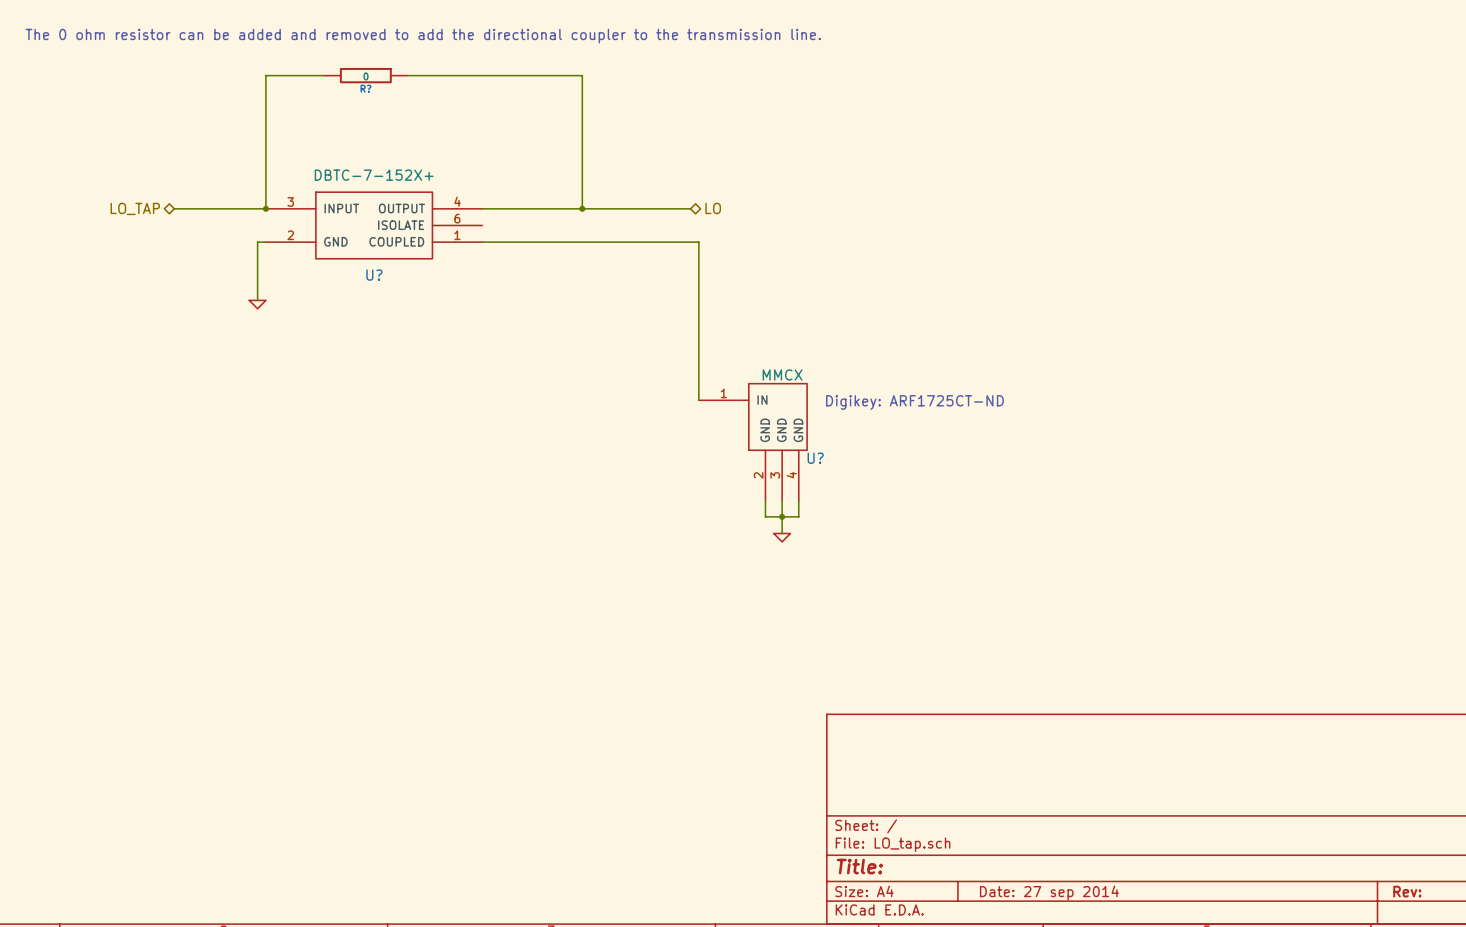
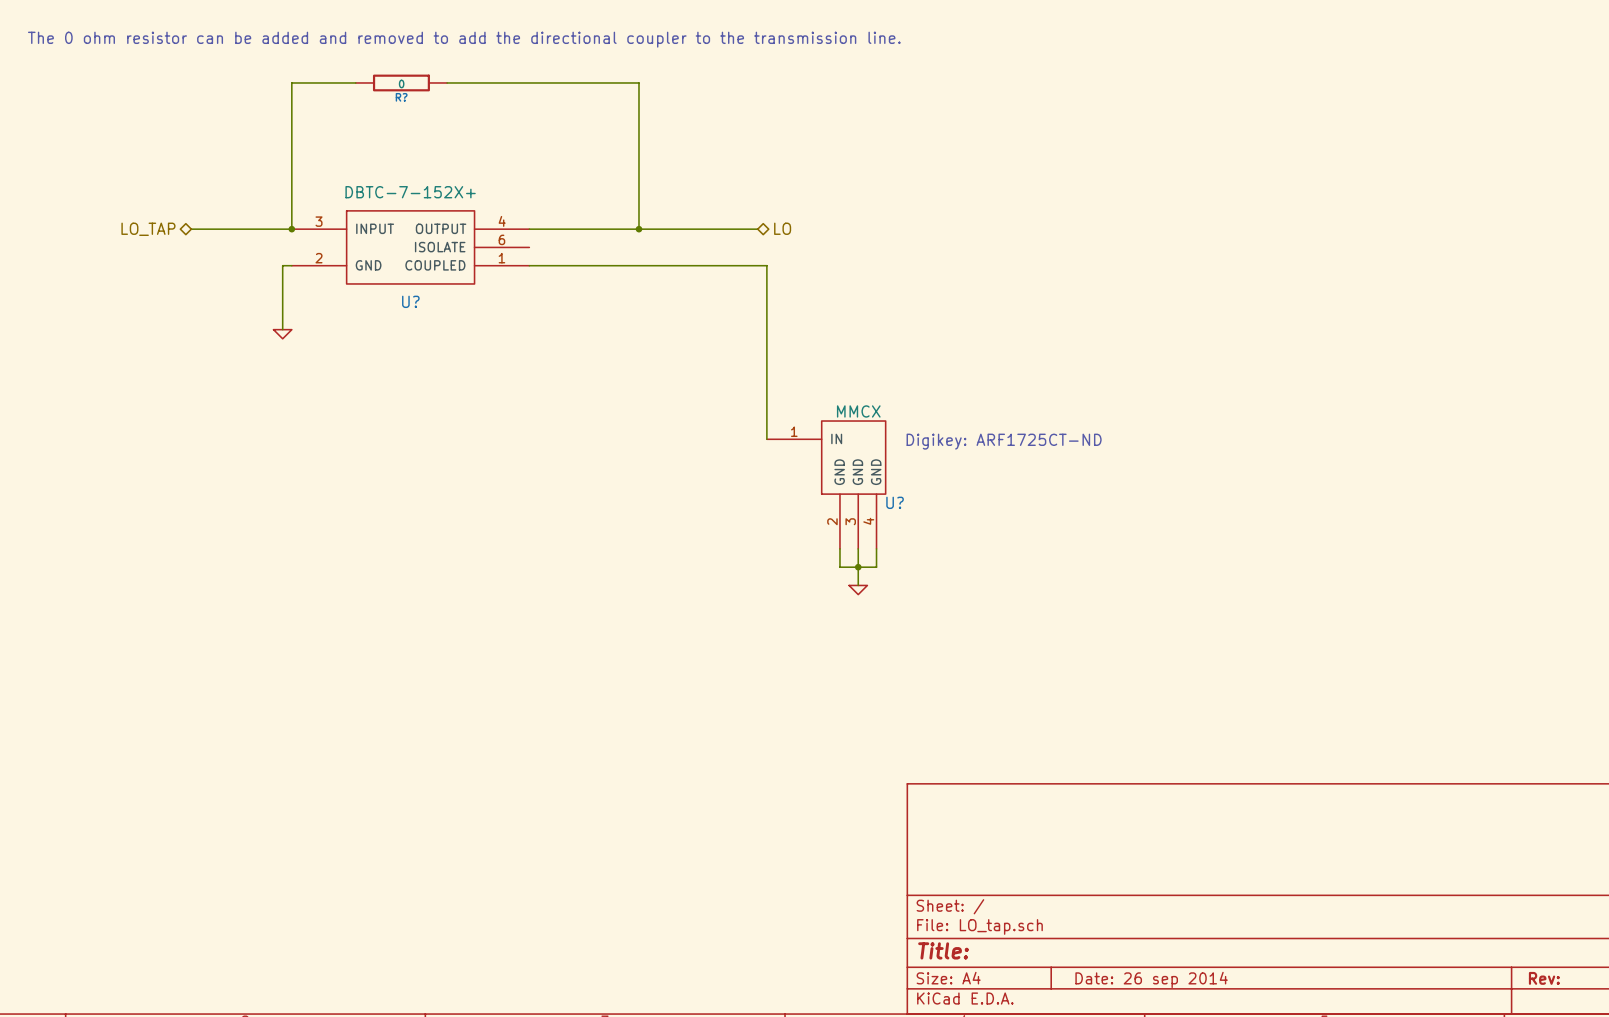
title block: Date: 27 sep 2014 (1049, 893) -> Date: 26 sep 2014 (1151, 979)

